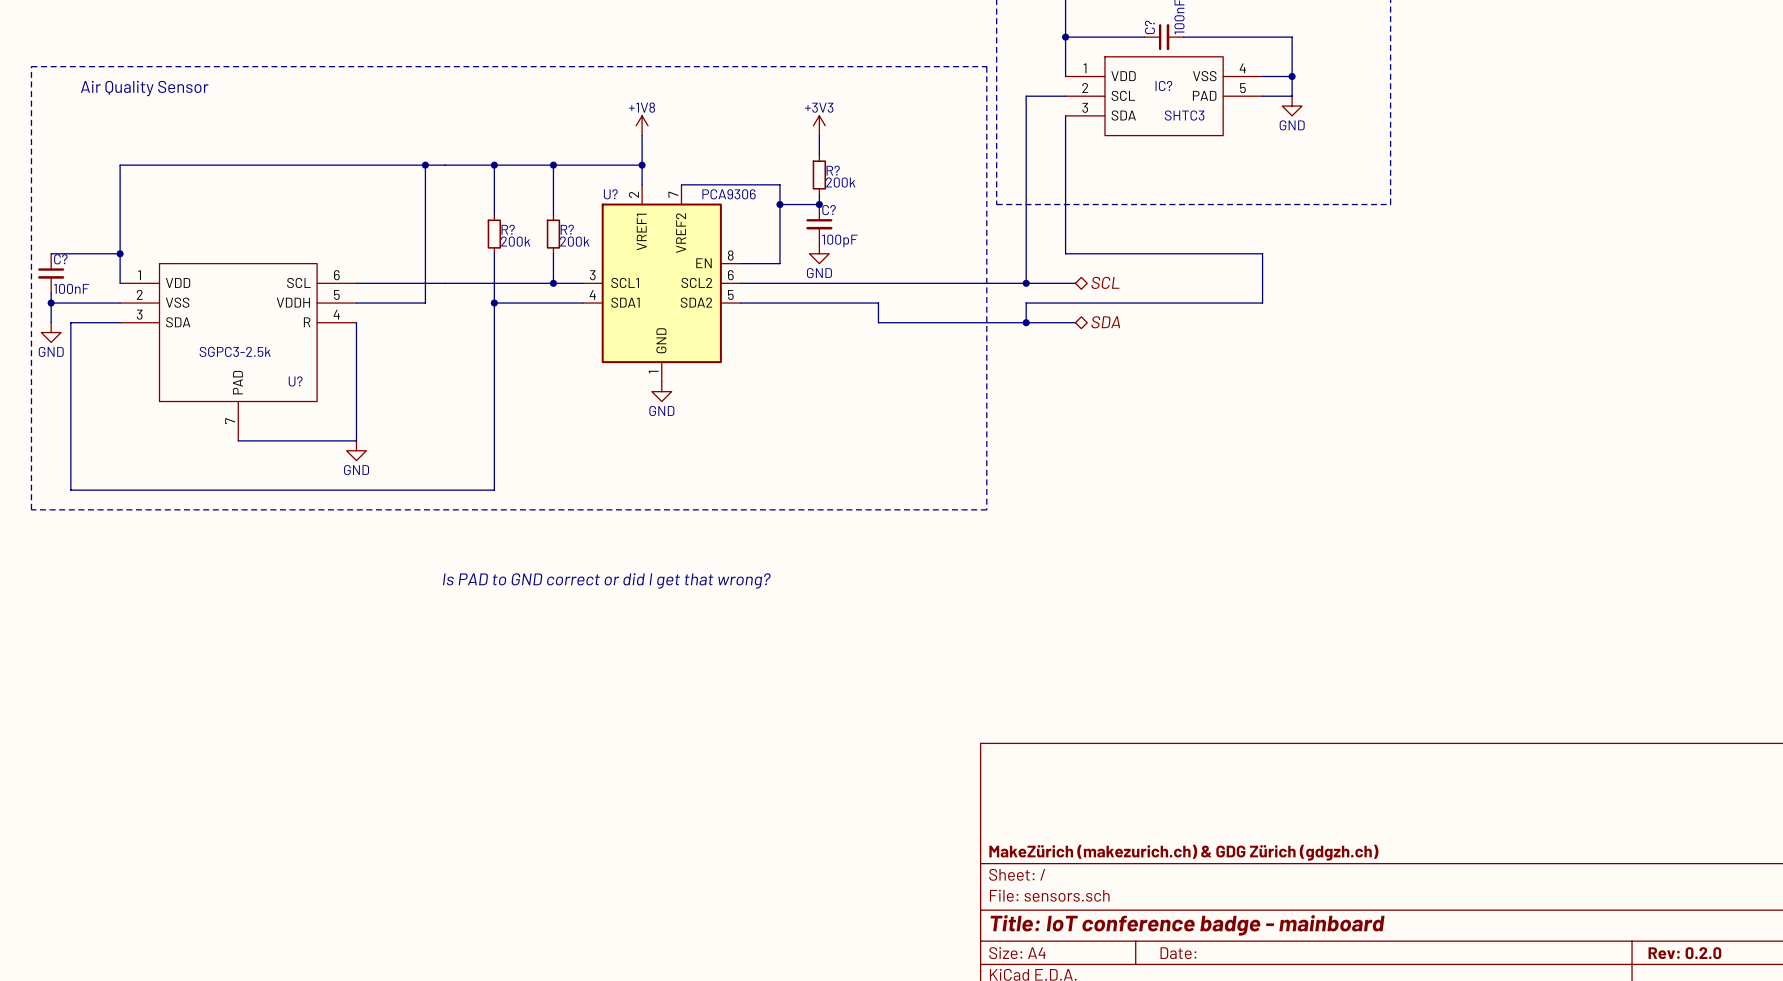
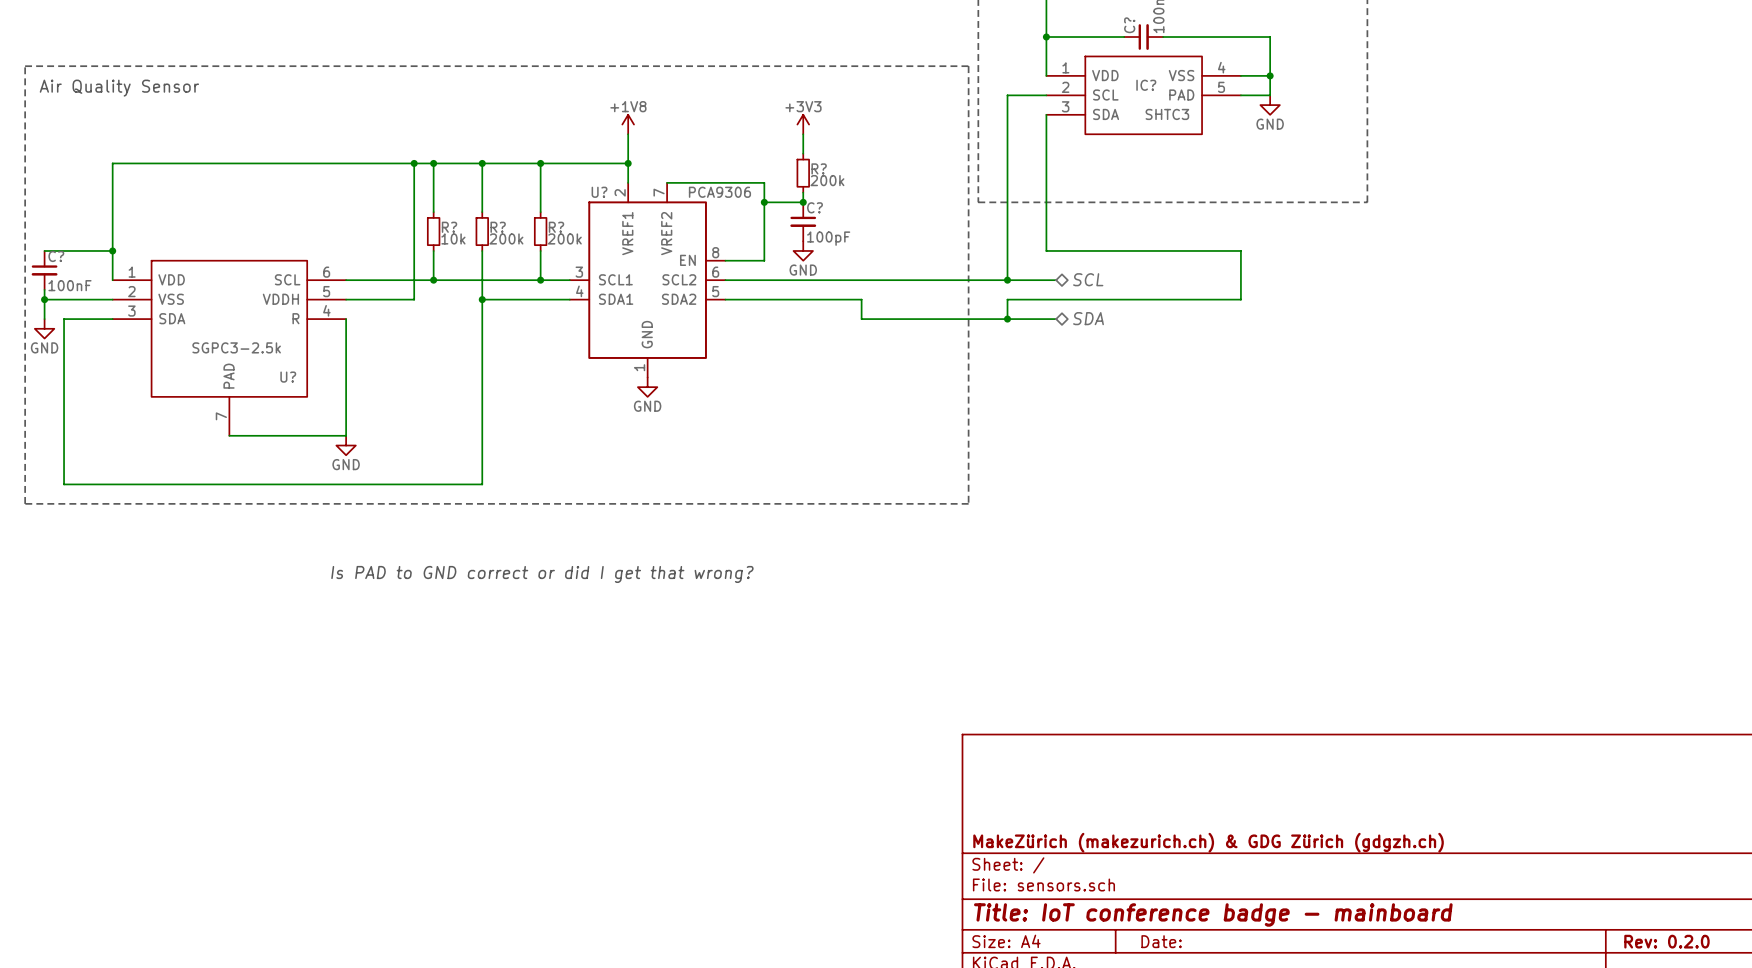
wire: none -> (433, 163) (433, 212)
junction: none -> (433, 163)
R?: none -> 10k (433, 231)
wire: none -> (433, 250) (433, 280)
junction: none -> (433, 280)

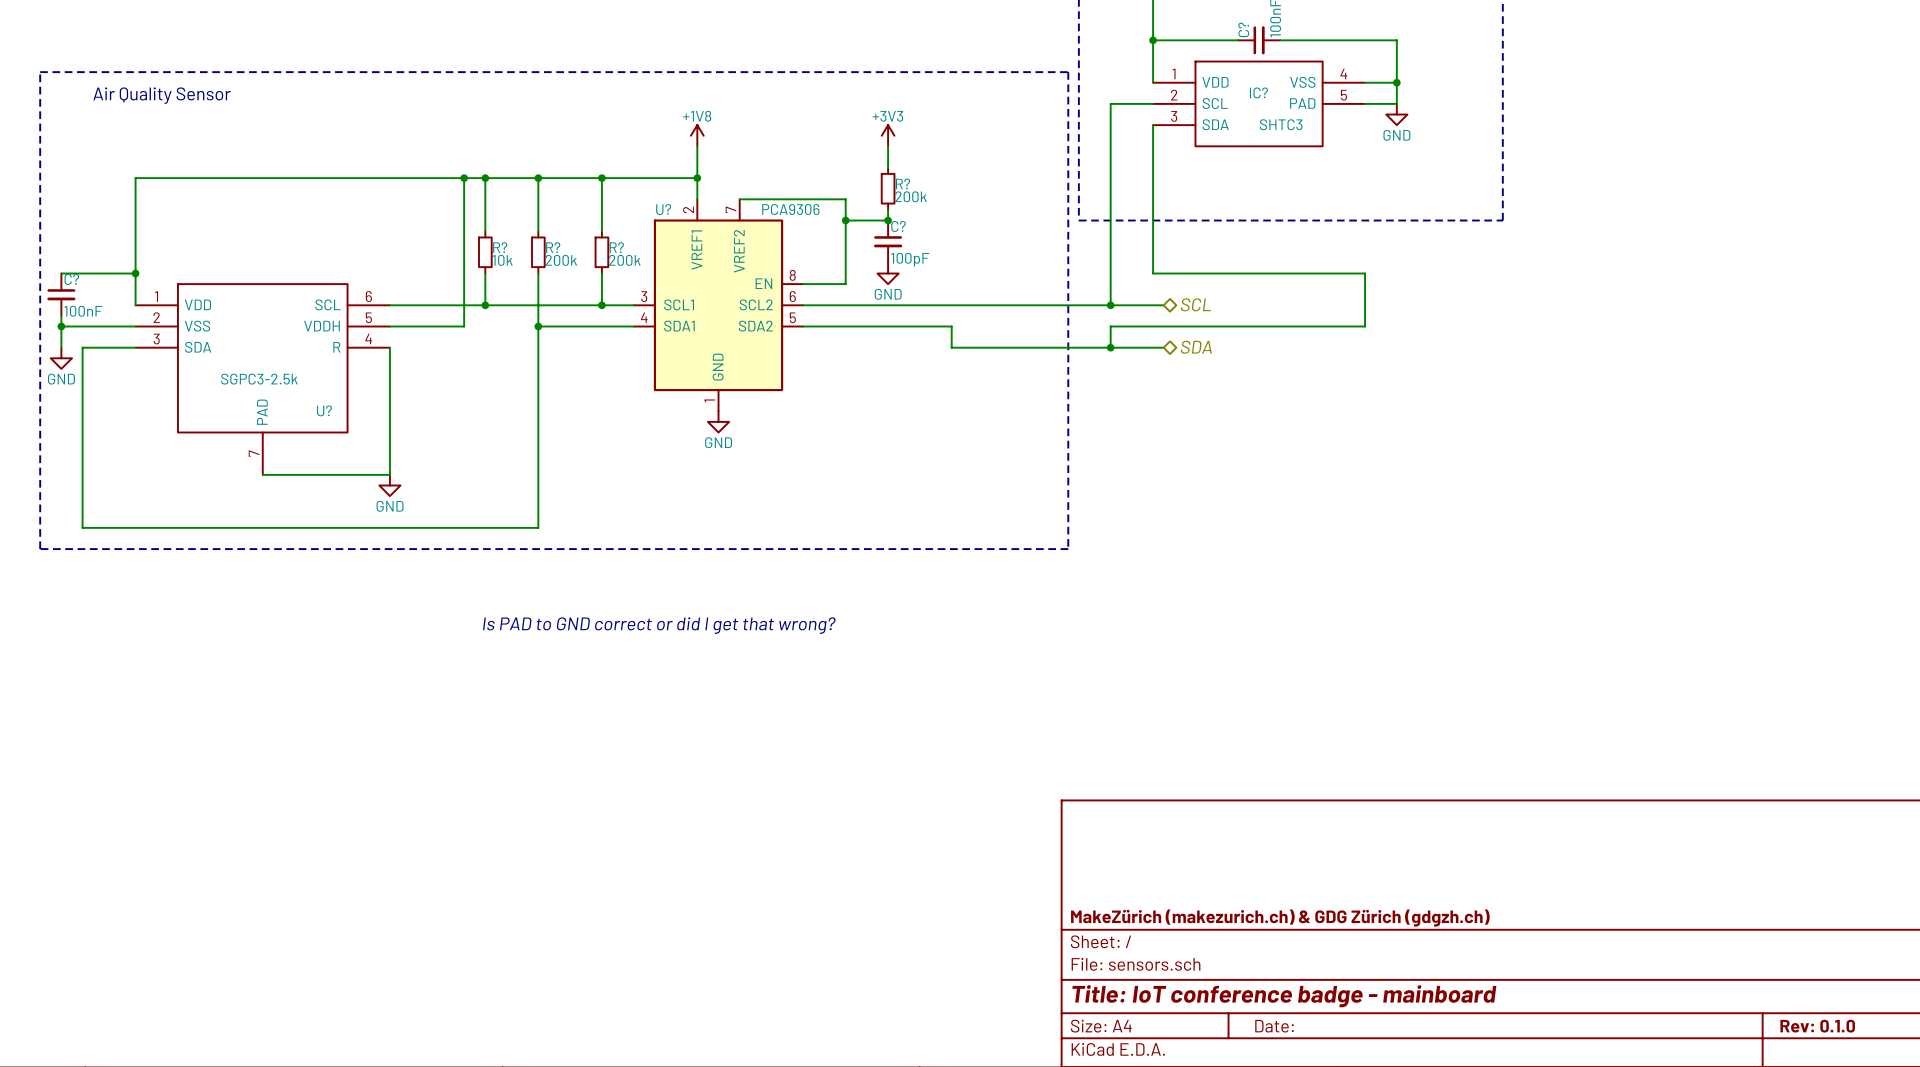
title block: Rev: 0.2.0 (1666, 941) -> Rev: 0.1.0 (1817, 1026)

